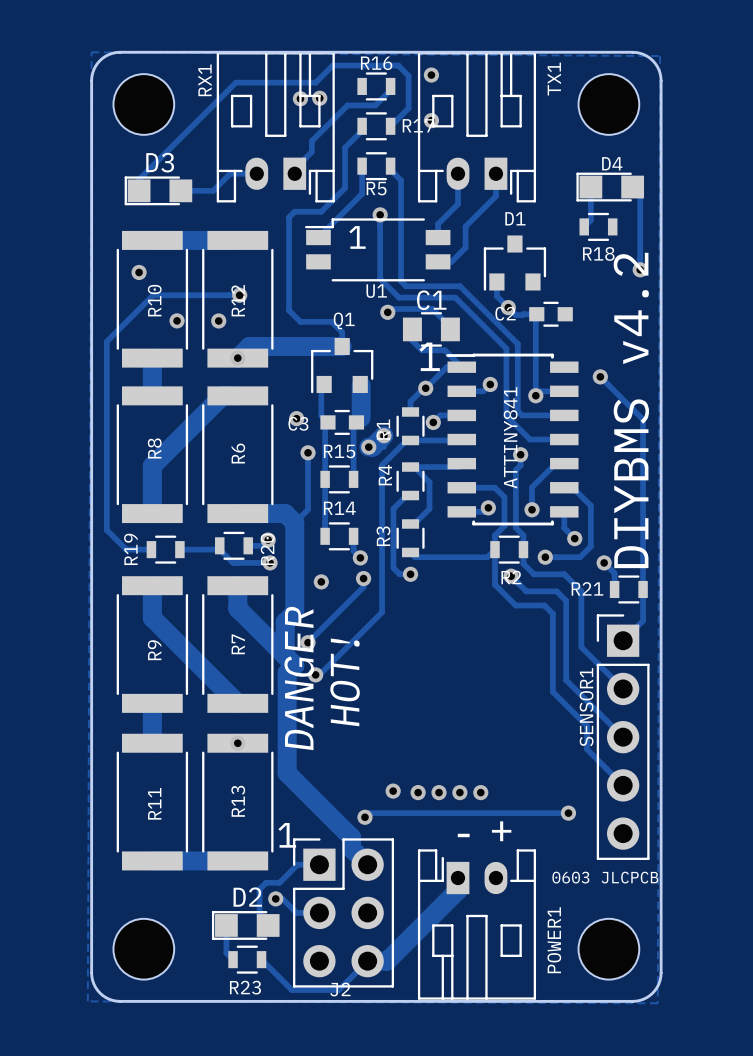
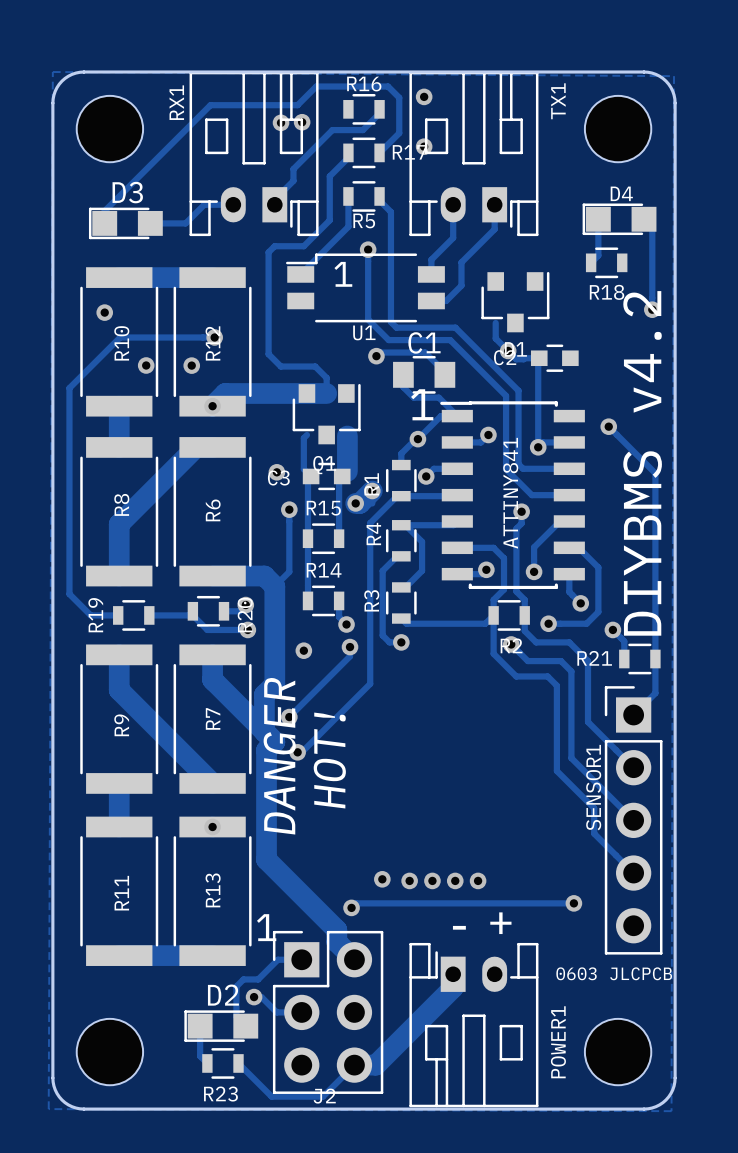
D1 rotation: 0° (514, 263) -> 180° (515, 302)
Q1 rotation: 0° (342, 365) -> 180° (326, 414)

